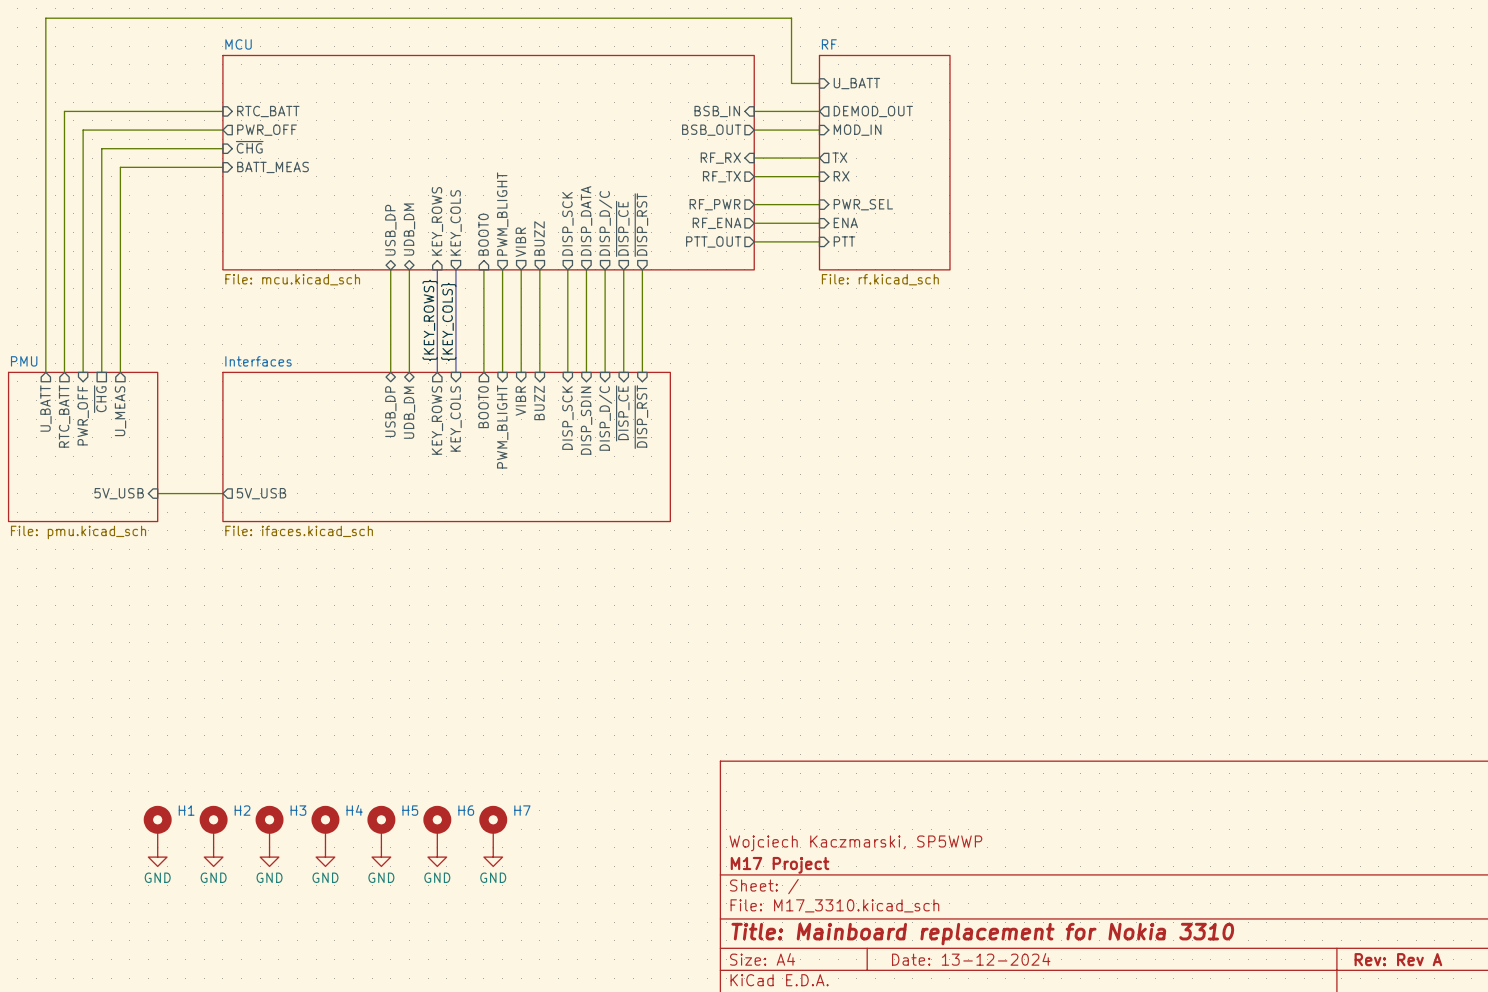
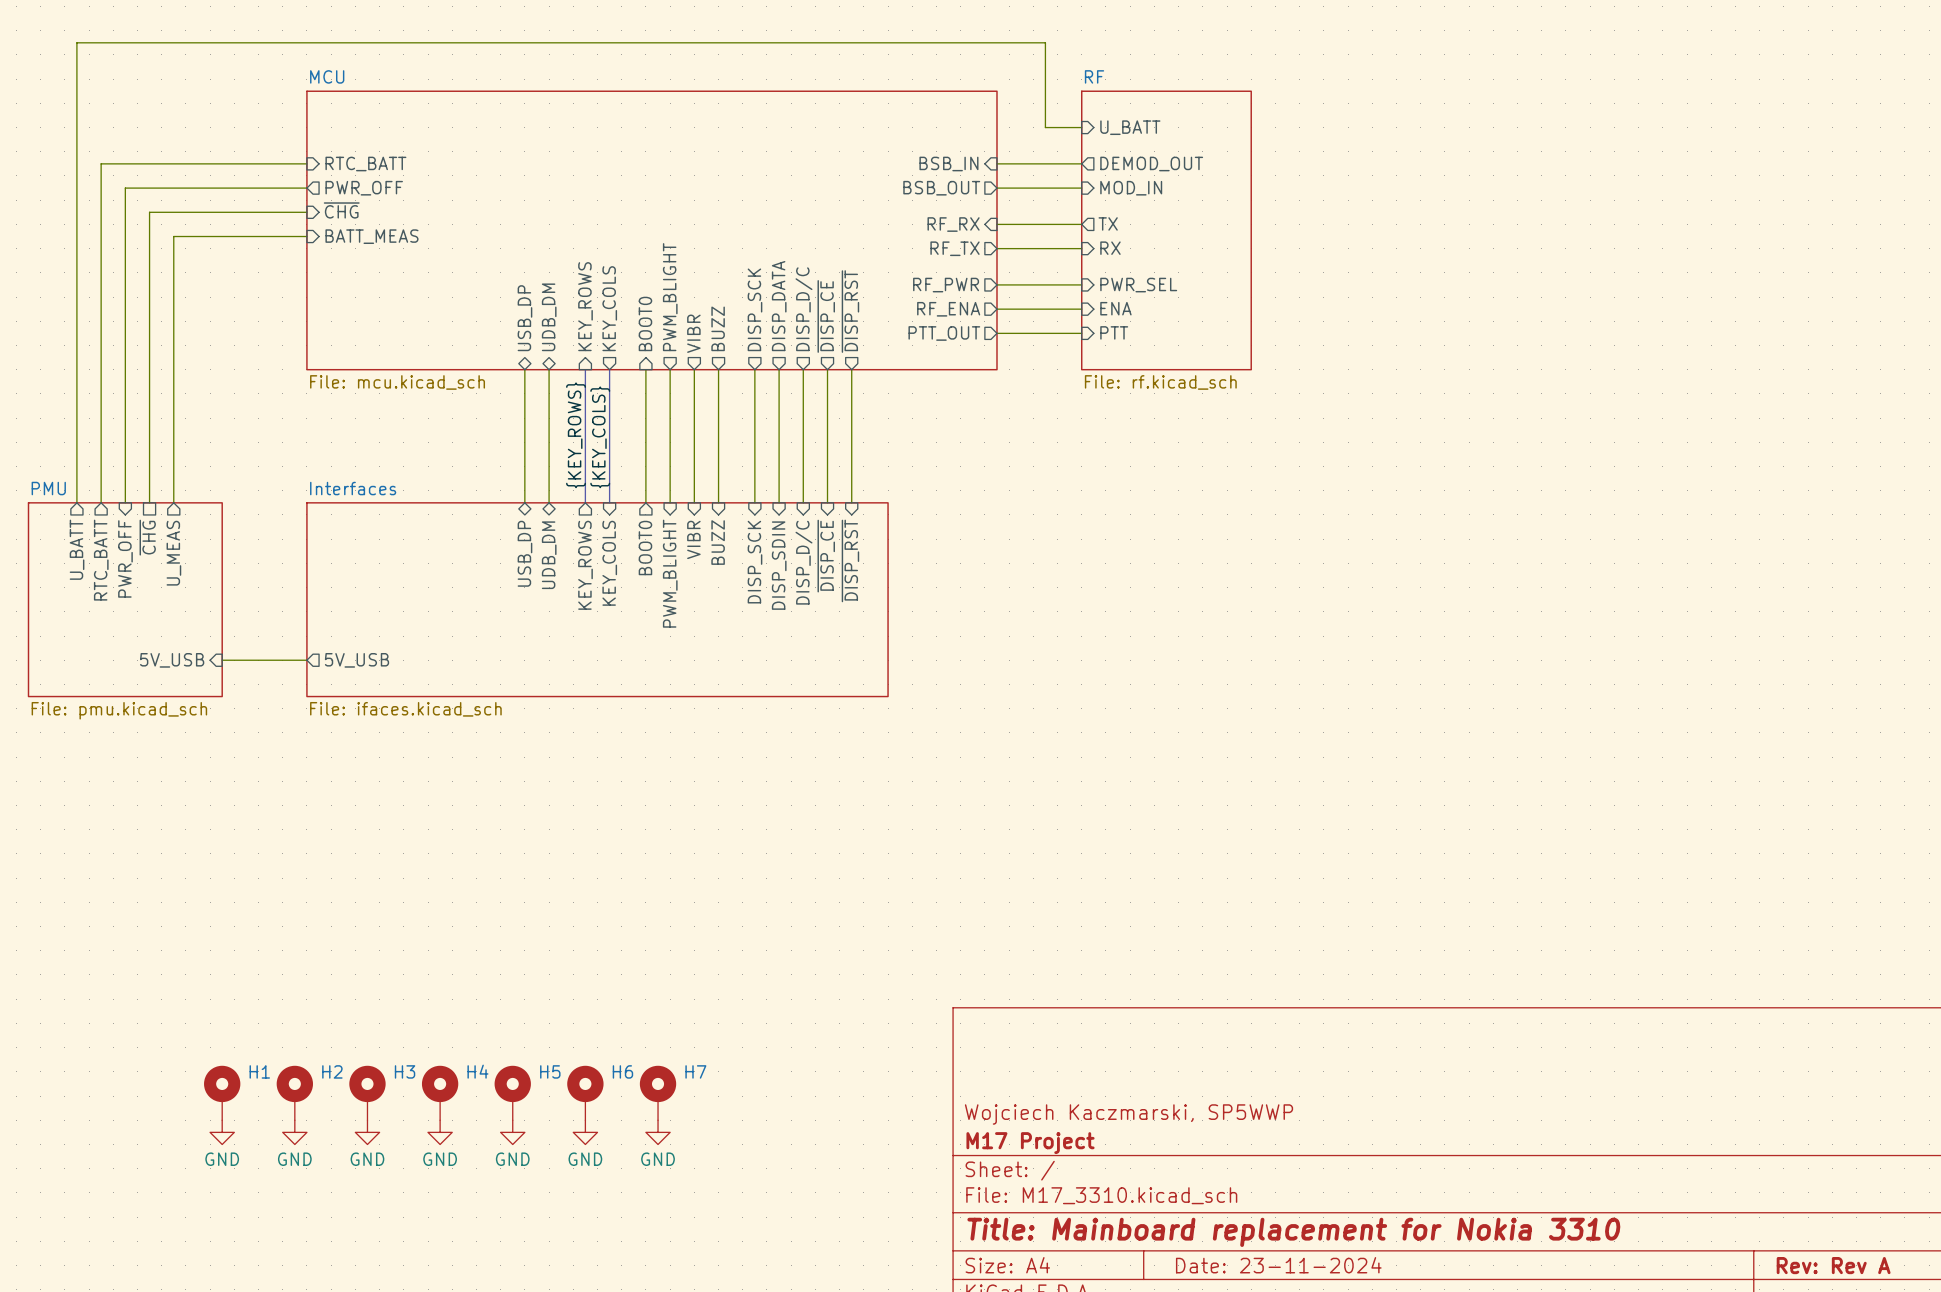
title block: Date: 13-12-2024 (971, 959) -> Date: 23-11-2024 (1278, 1265)

